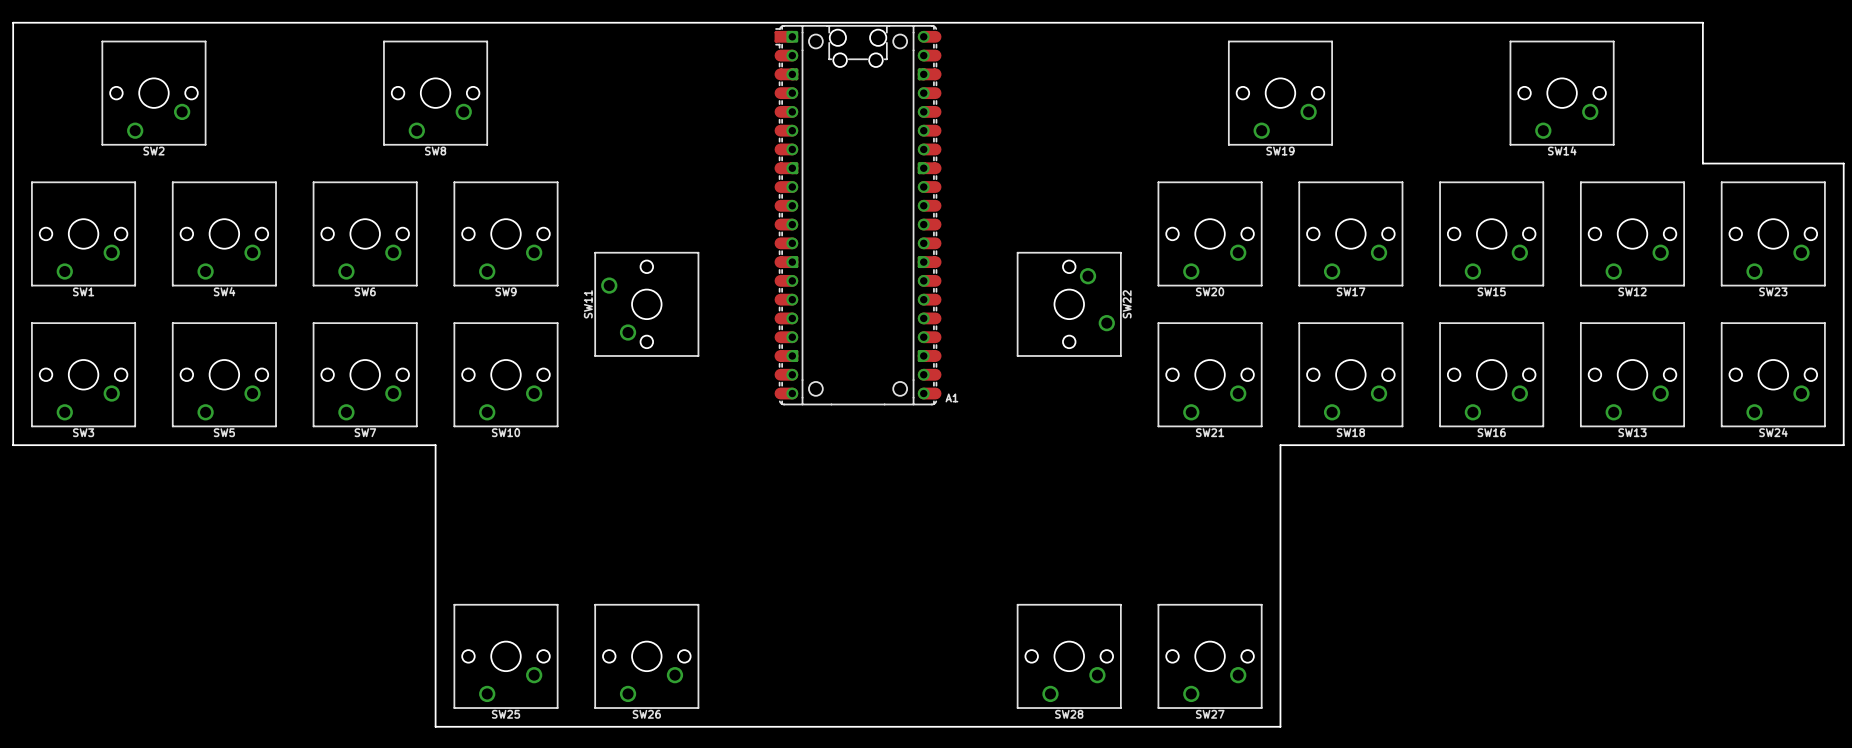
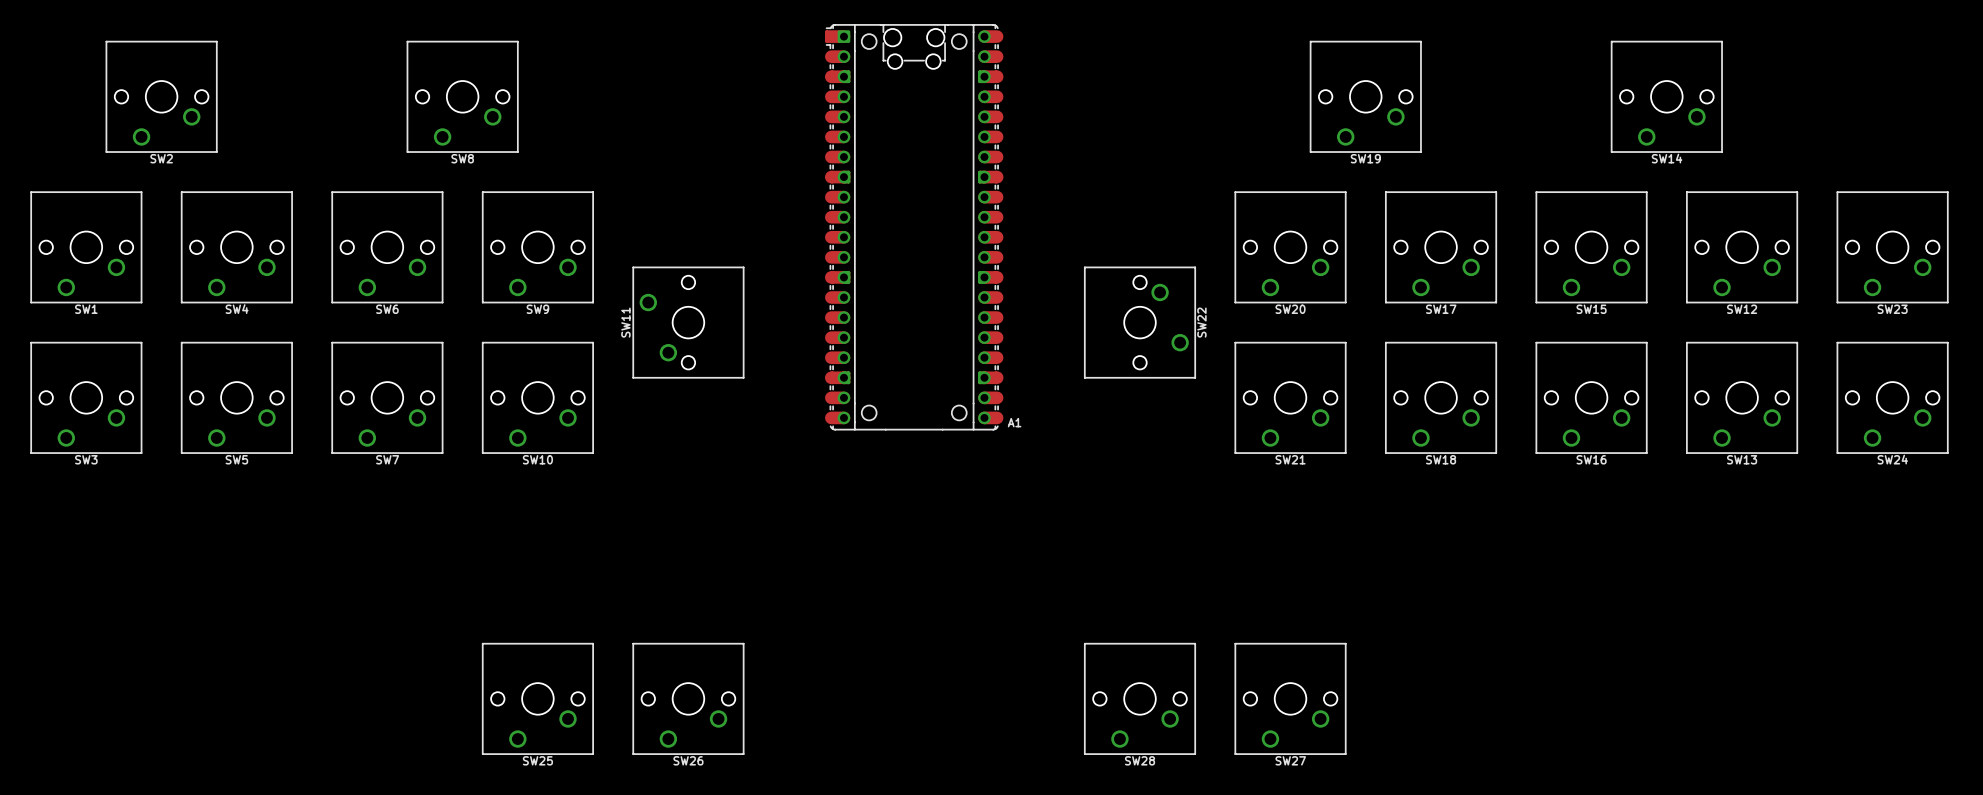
board edge: (13, 22) (1702, 22) (1702, 163) (1843, 163) (1843, 445) (1280, 445) (1280, 726) (435, 726) (435, 445) (13, 445) (13, 22) -> none

